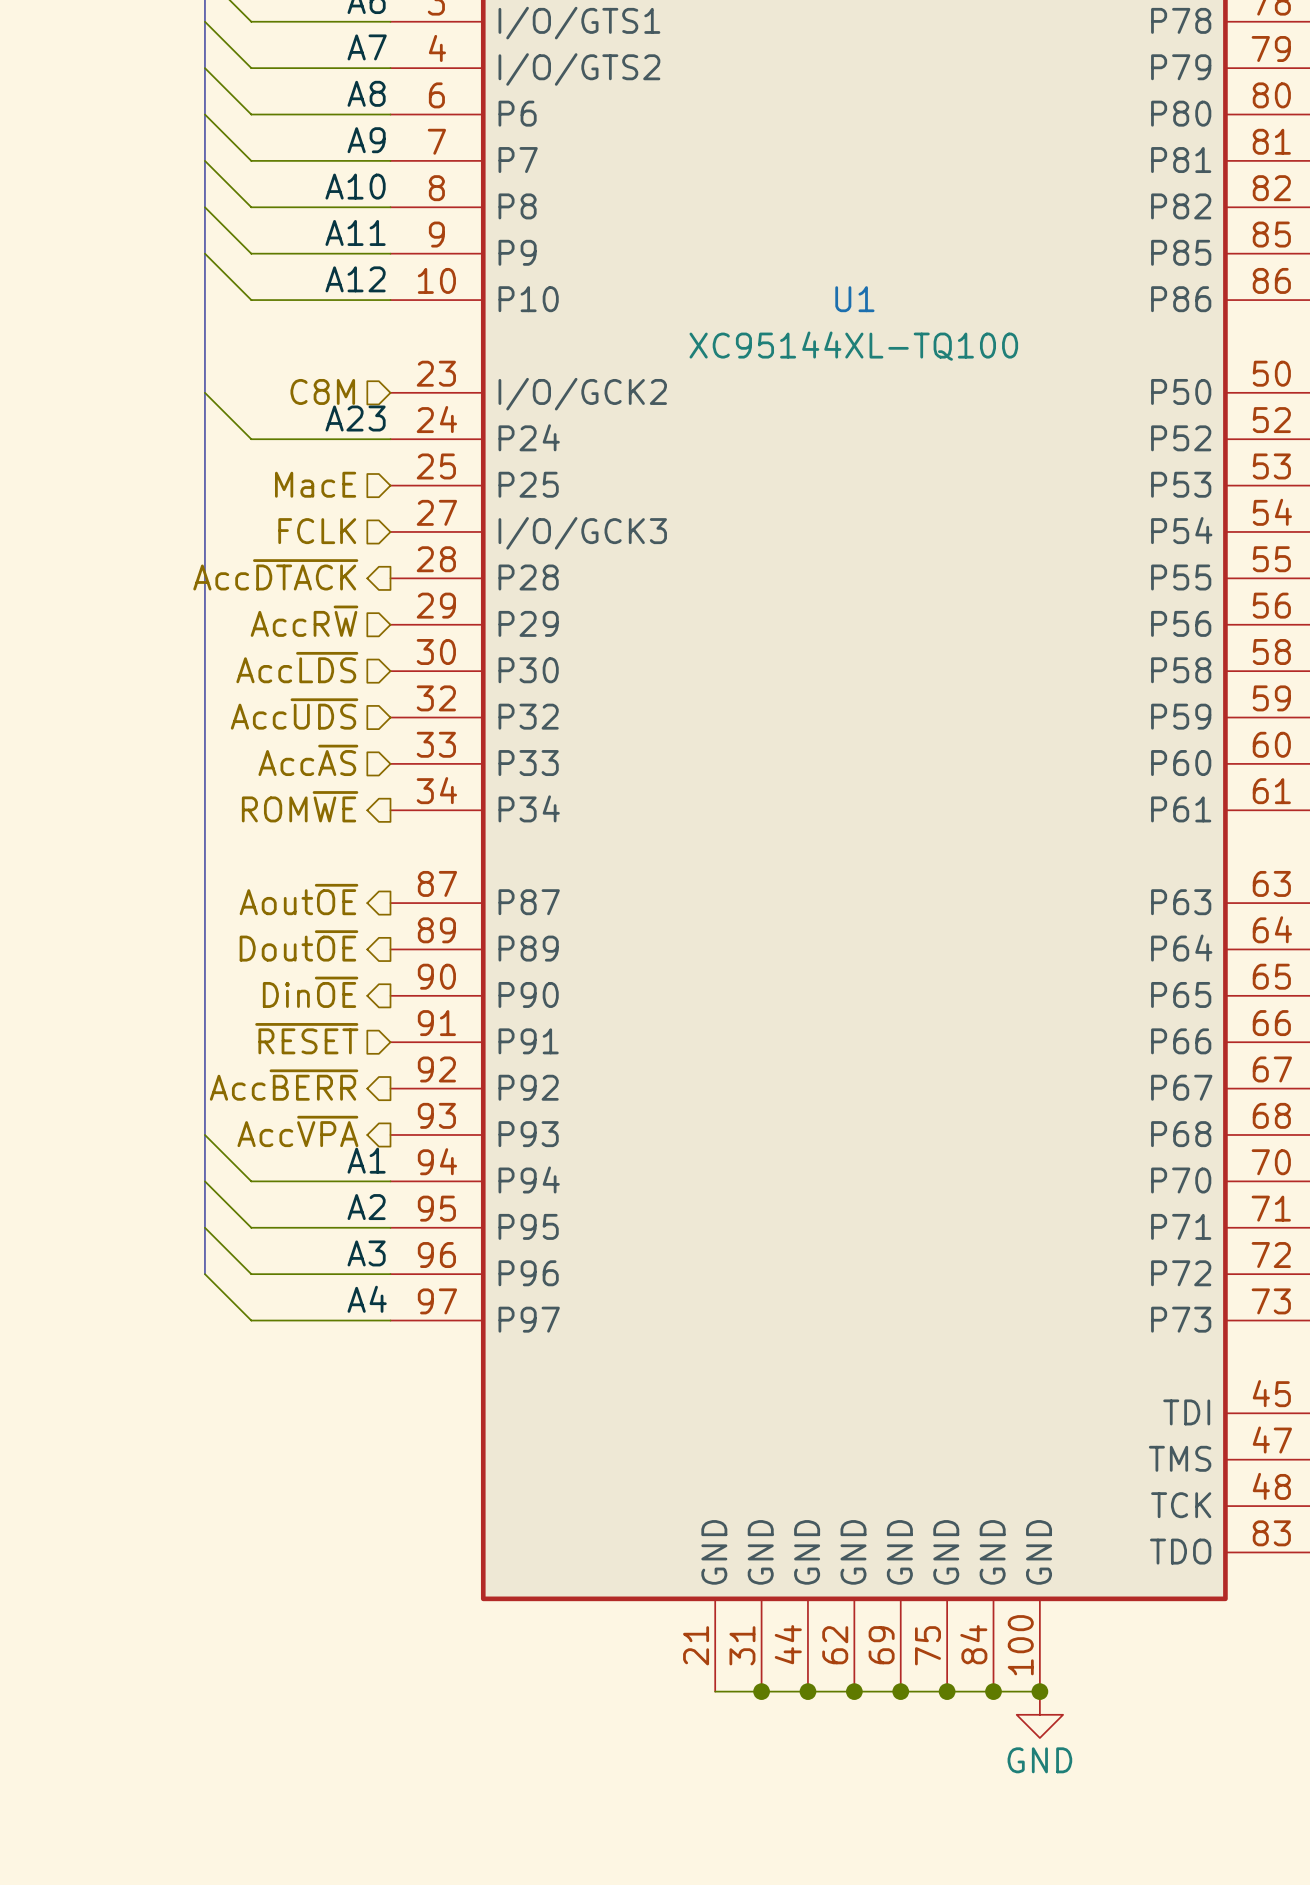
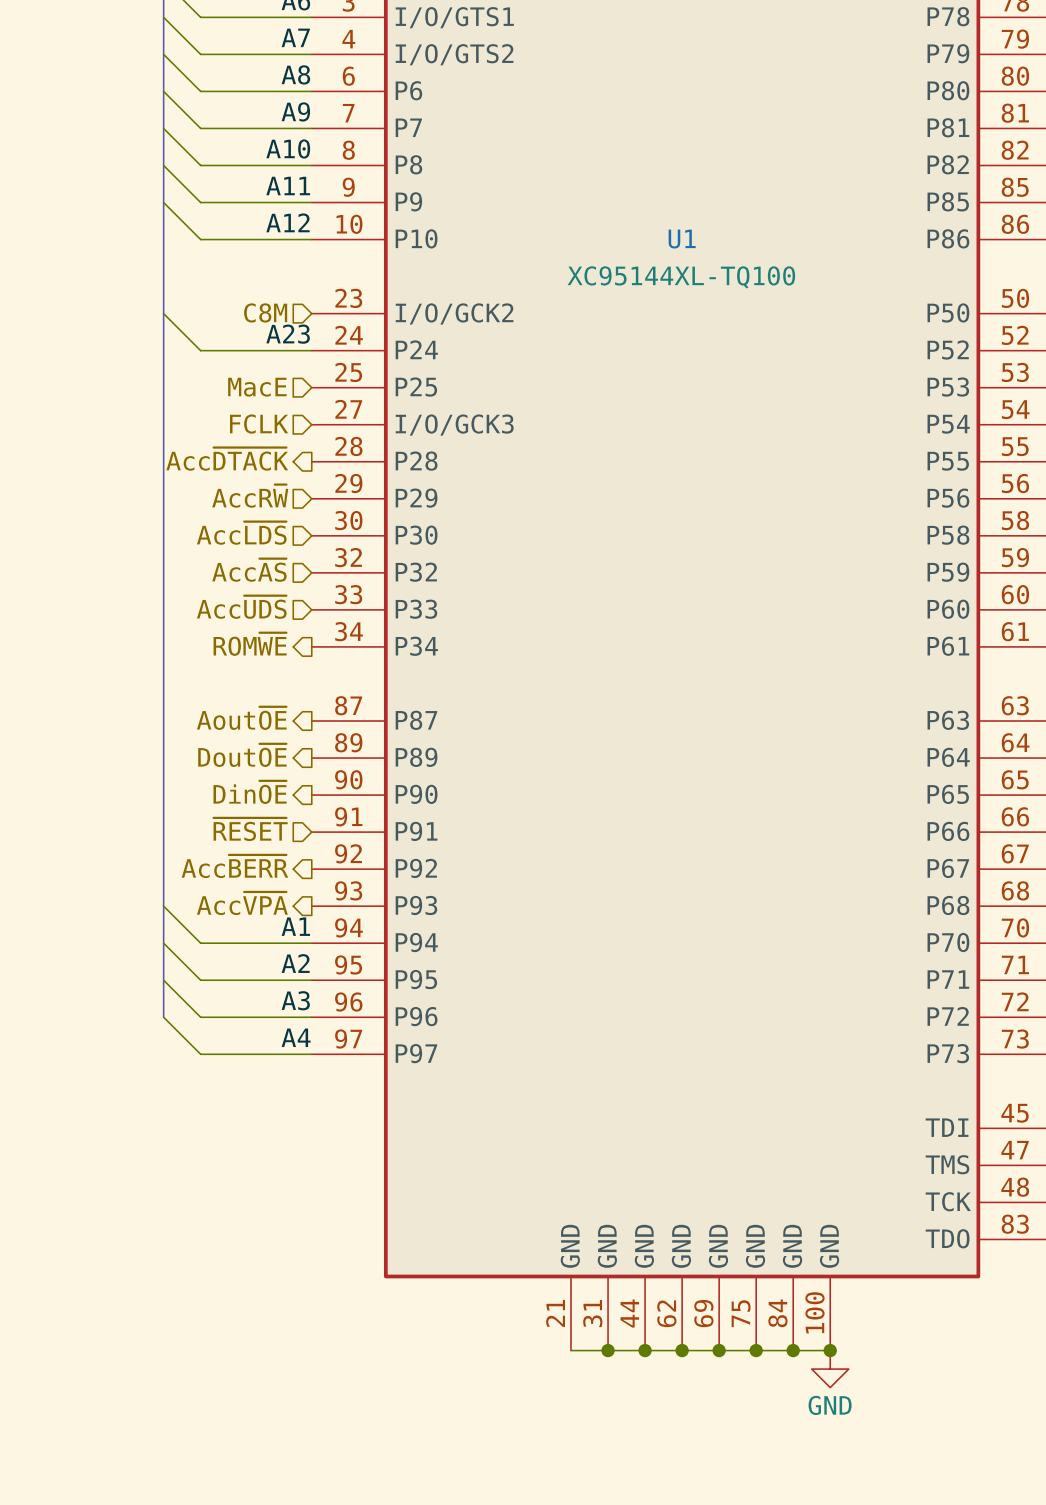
hierarchical label: Acc~{UDS} (294, 713) -> Acc~{AS} (249, 570)
hierarchical label: Acc~{AS} (308, 760) -> Acc~{UDS} (241, 607)

